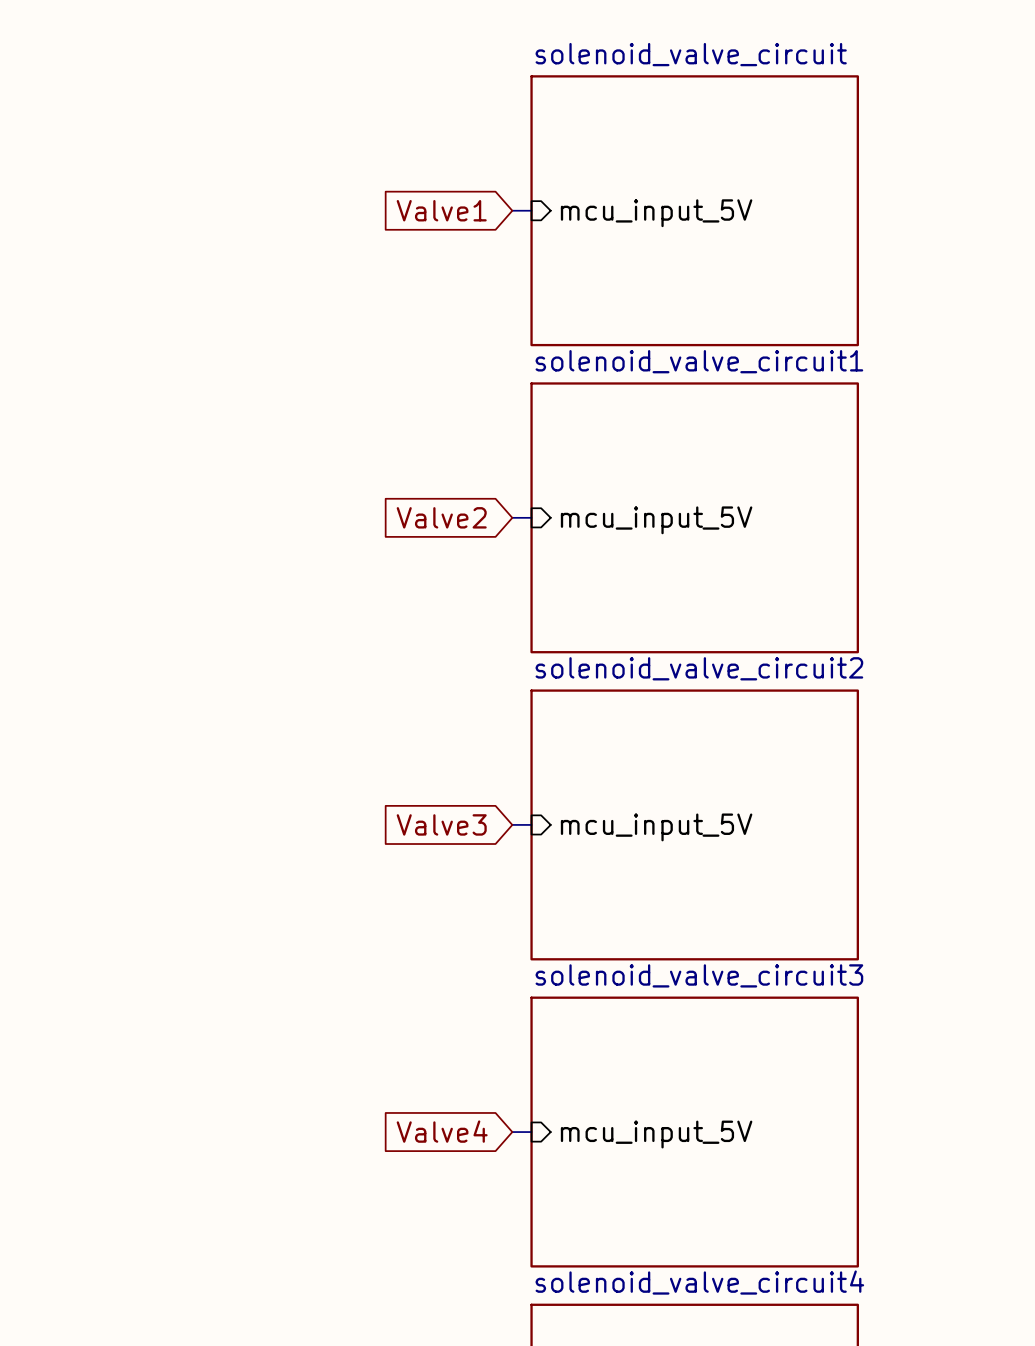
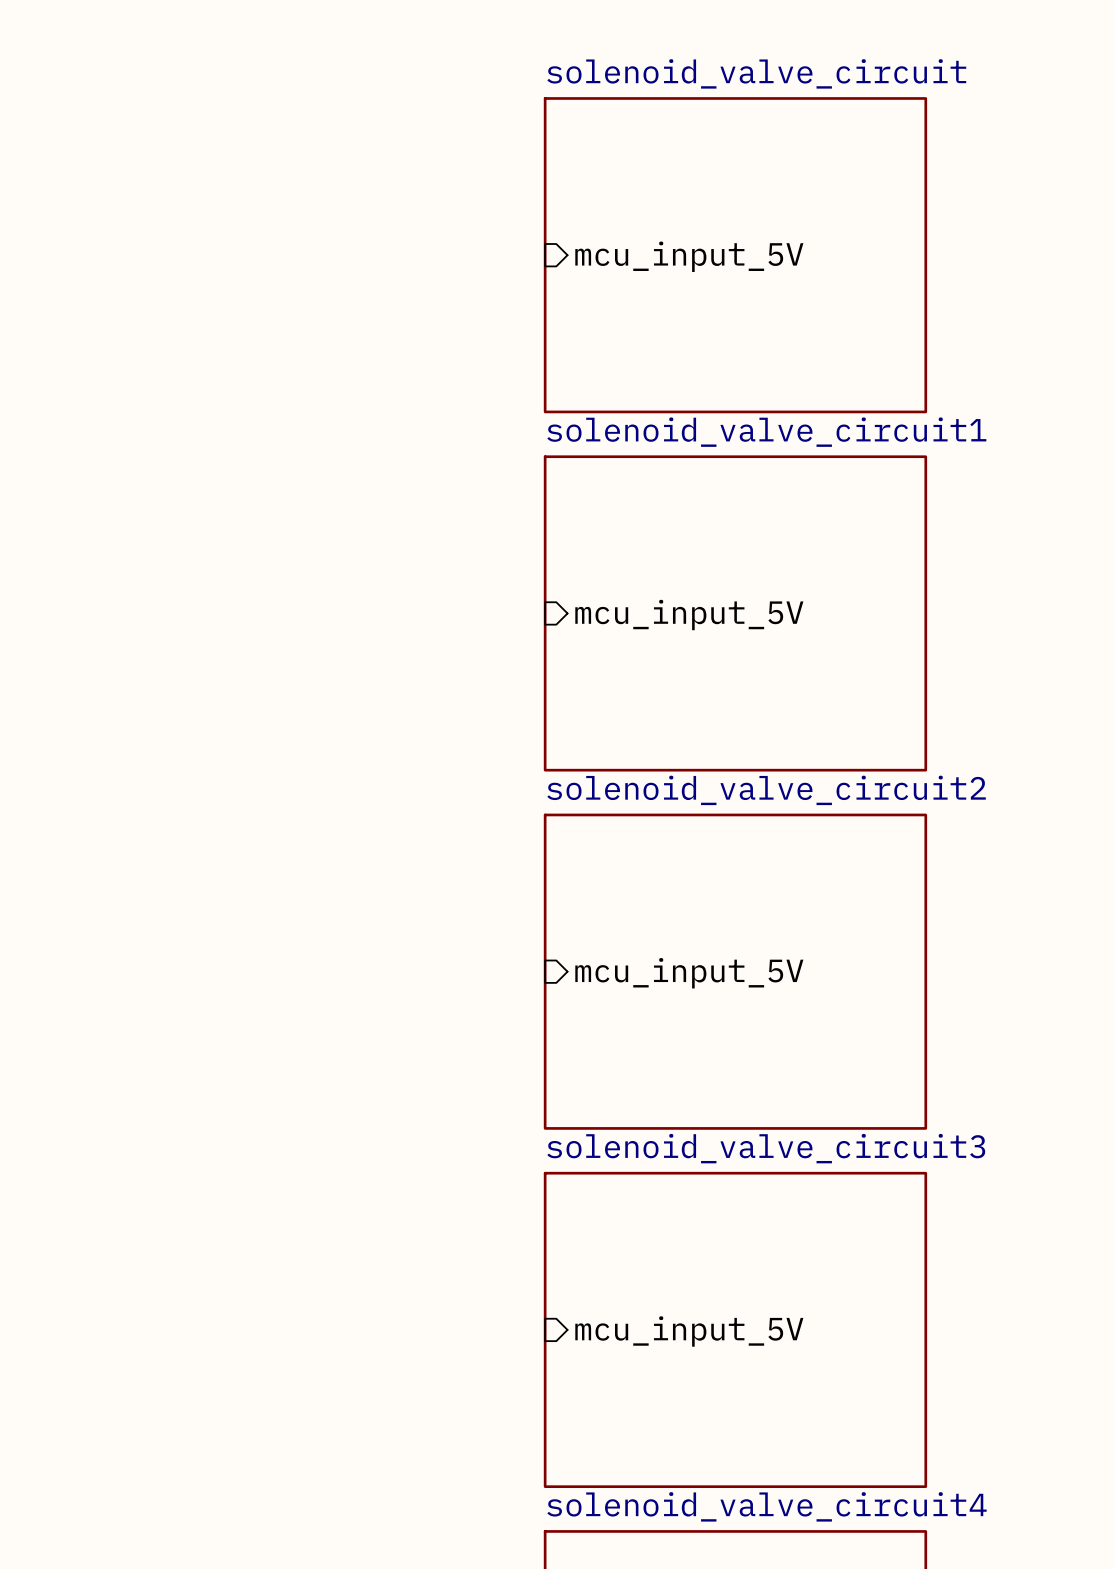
global label: Valve1 (441, 210) -> none
wire: (512, 210) (531, 210) -> none
global label: Valve2 (441, 517) -> none
wire: (512, 517) (531, 517) -> none
global label: Valve3 (441, 824) -> none
wire: (512, 824) (531, 824) -> none
global label: Valve4 (442, 1131) -> none
wire: (512, 1132) (531, 1132) -> none

